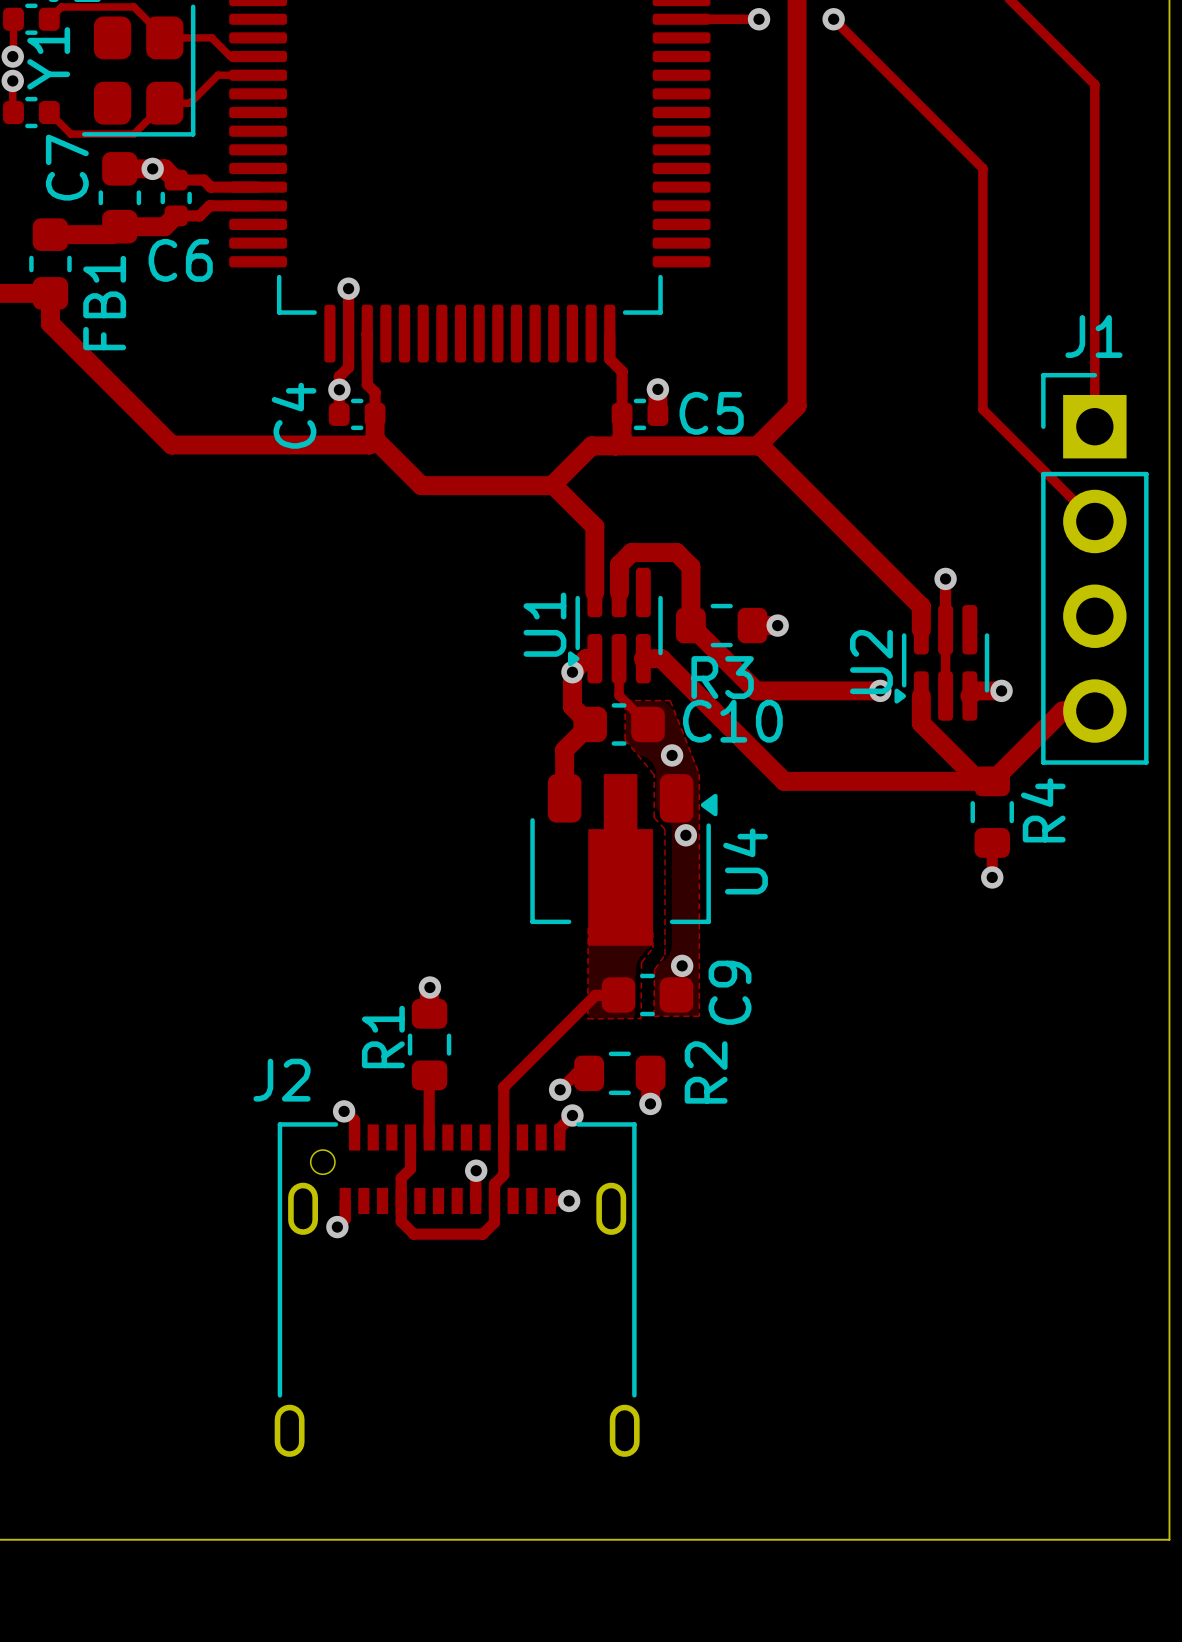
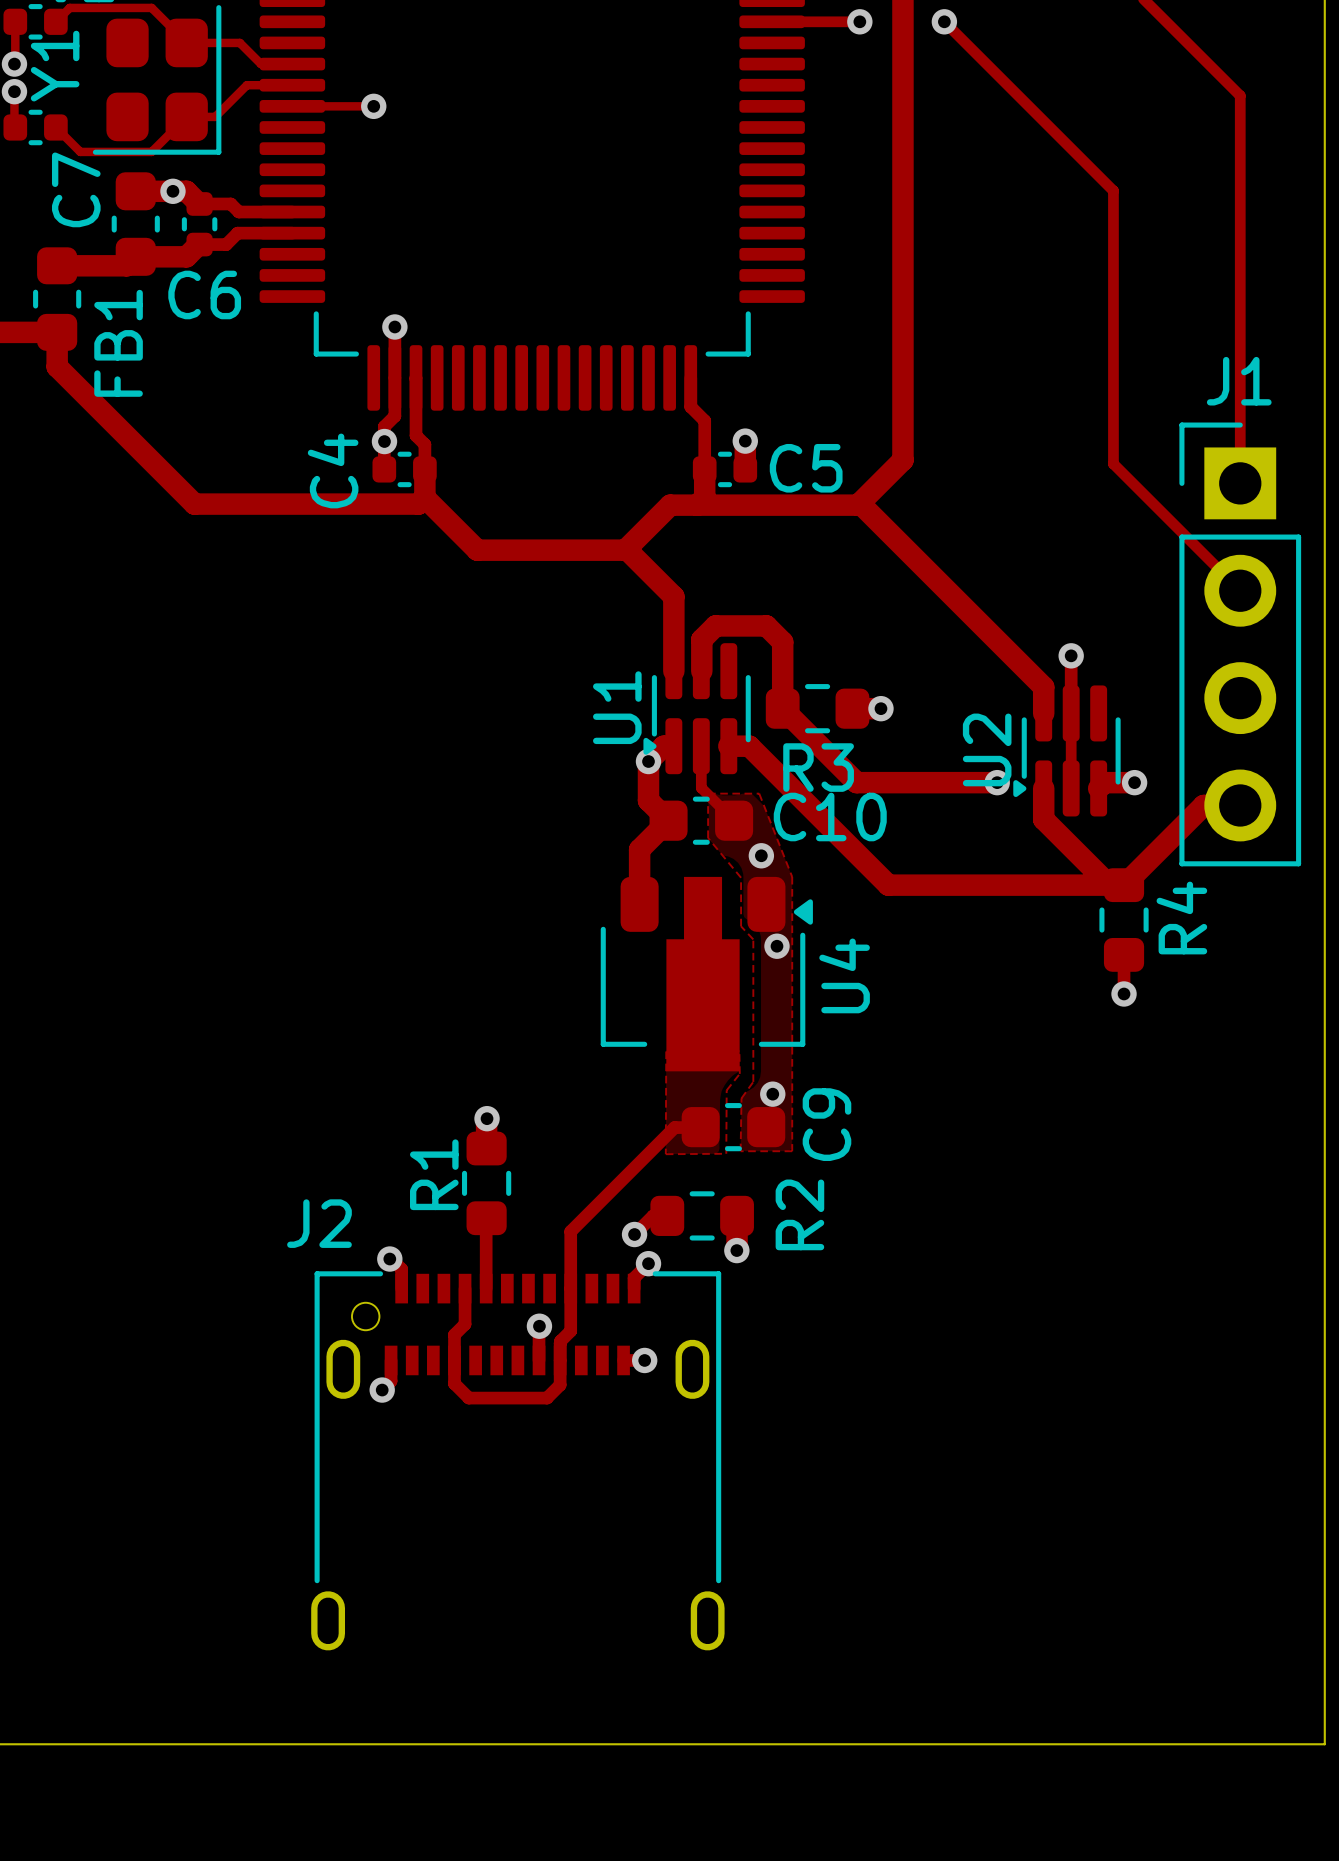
track: none -> (292, 106) (373, 106)
via: none -> (373, 106)

